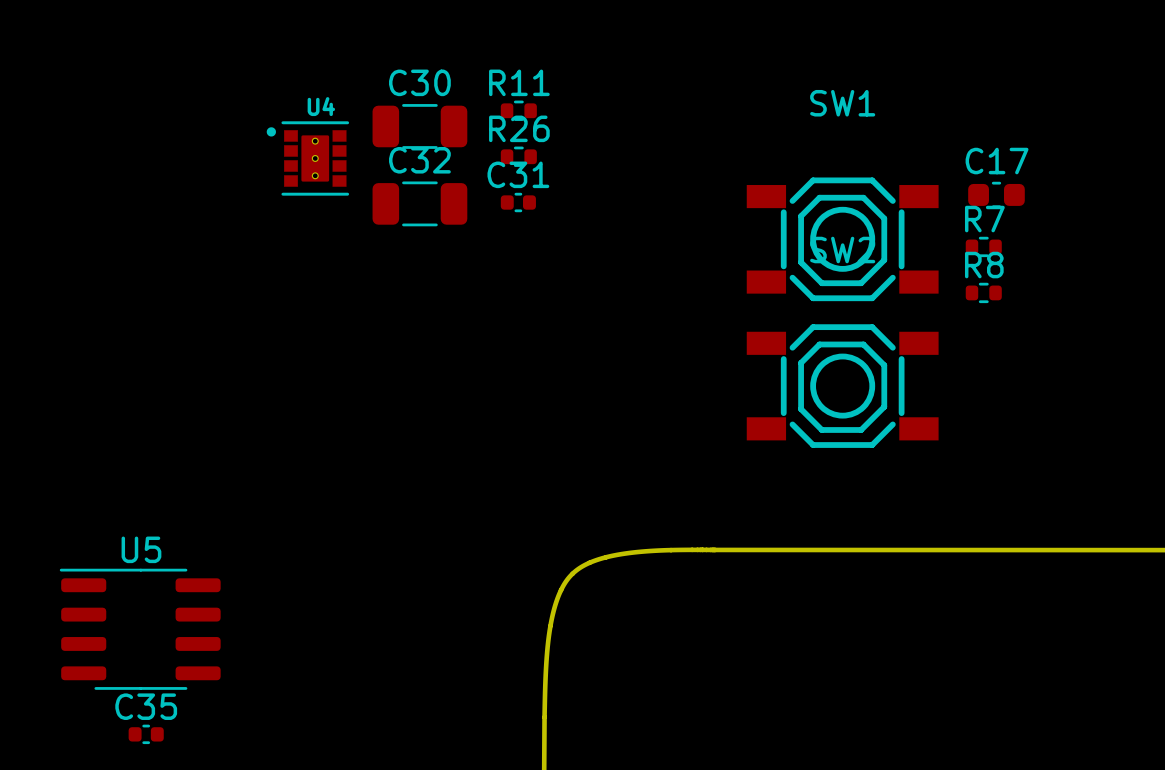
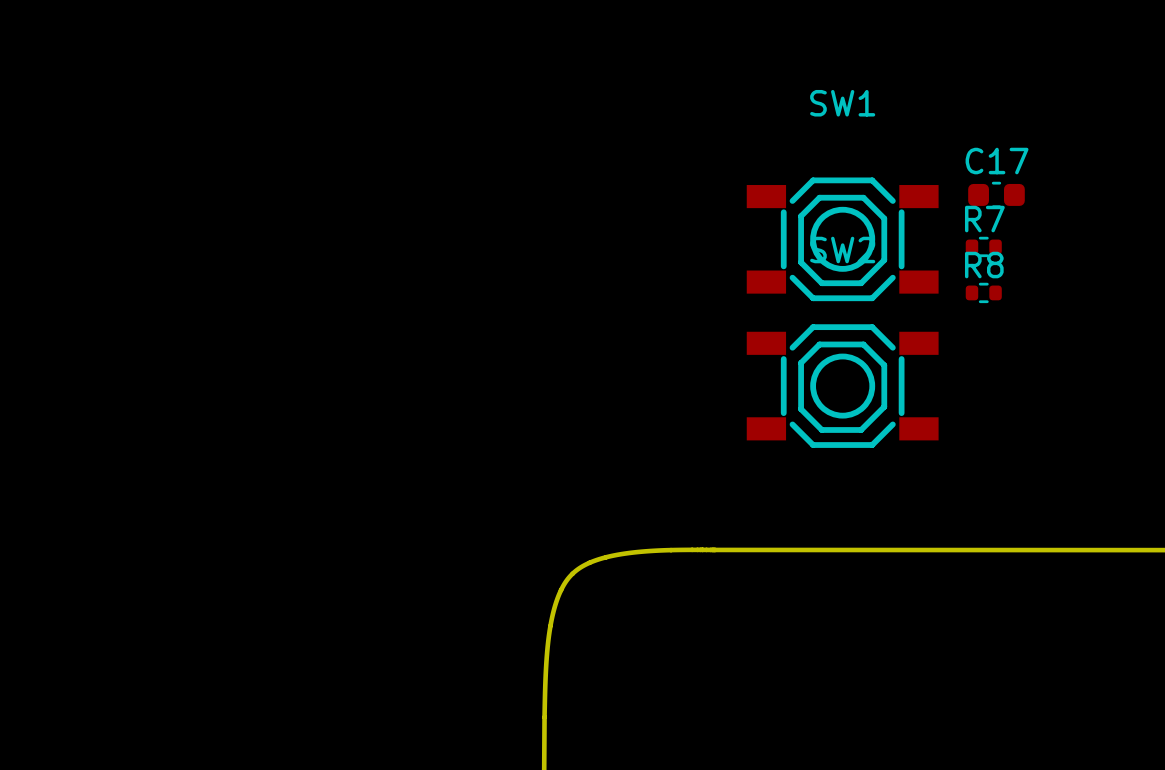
R11: (518, 110) -> none
C30: (419, 126) -> none
R26: (518, 156) -> none
U4: (307, 158) -> none
C31: (518, 202) -> none
C32: (419, 203) -> none
U5: (140, 629) -> none
C35: (146, 734) -> none

